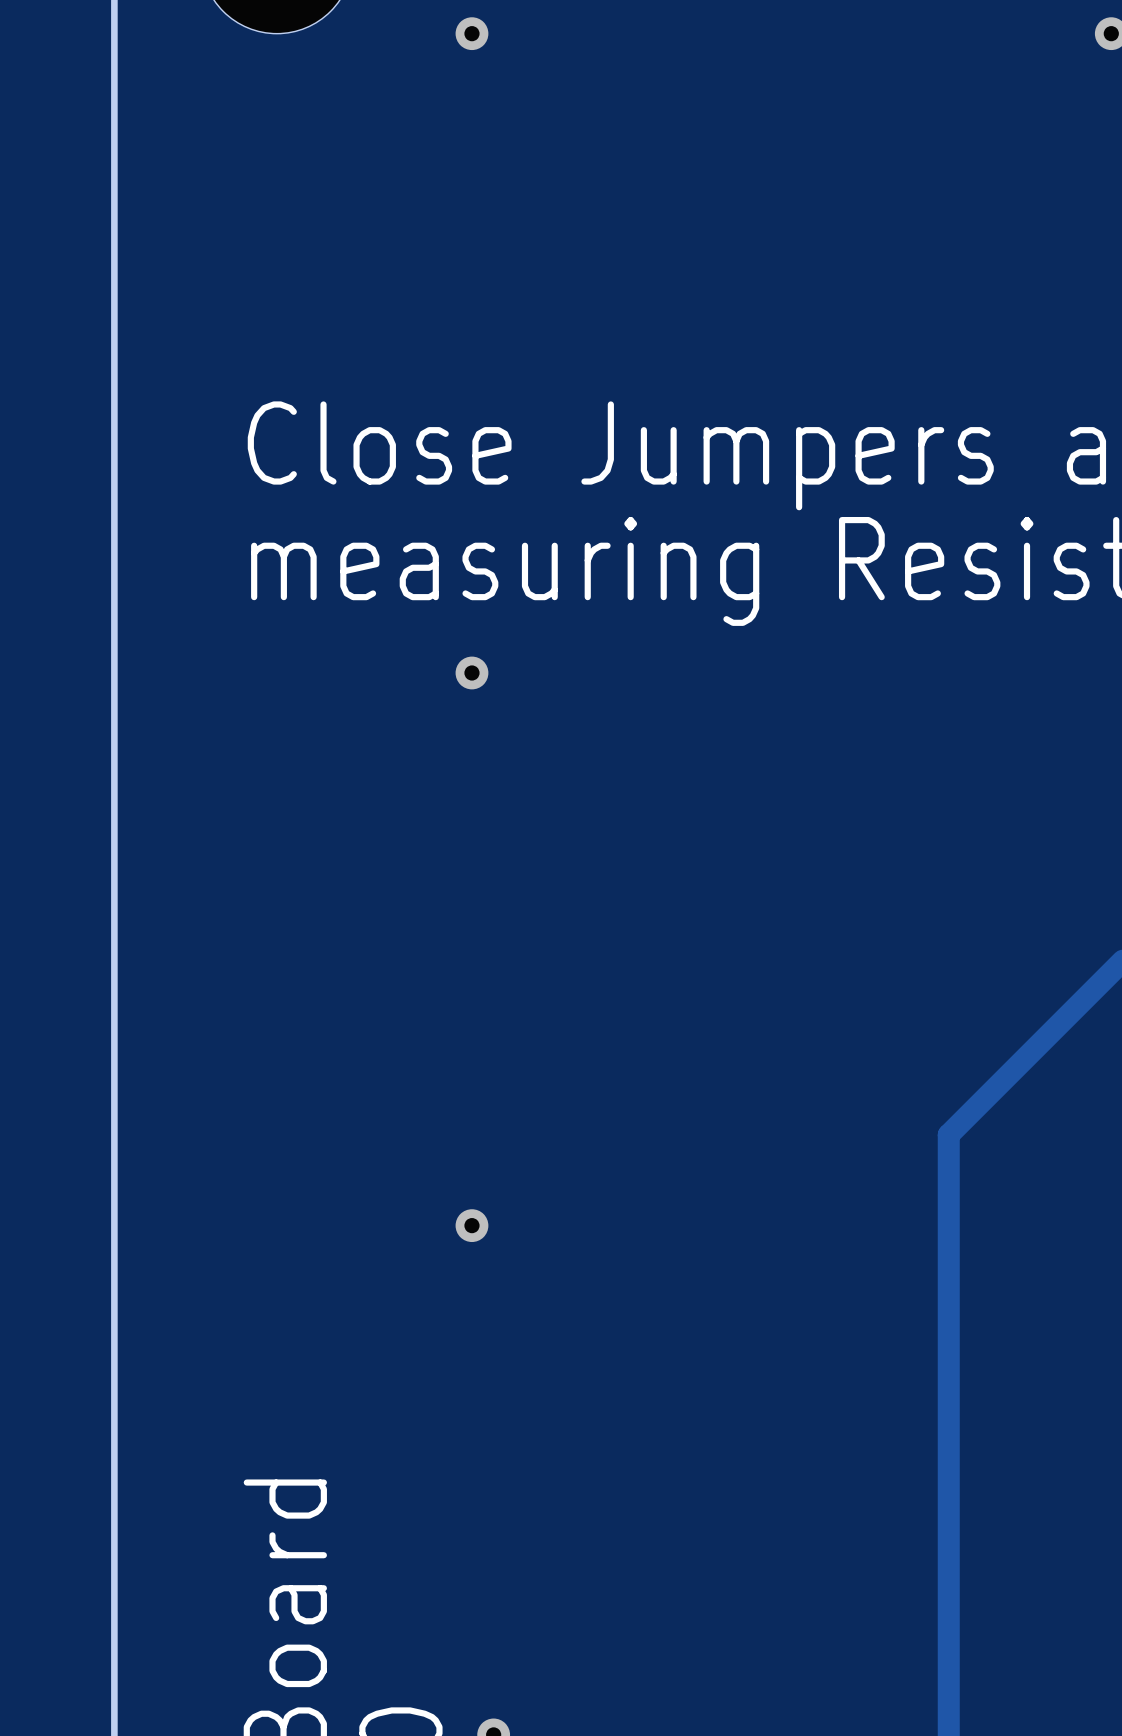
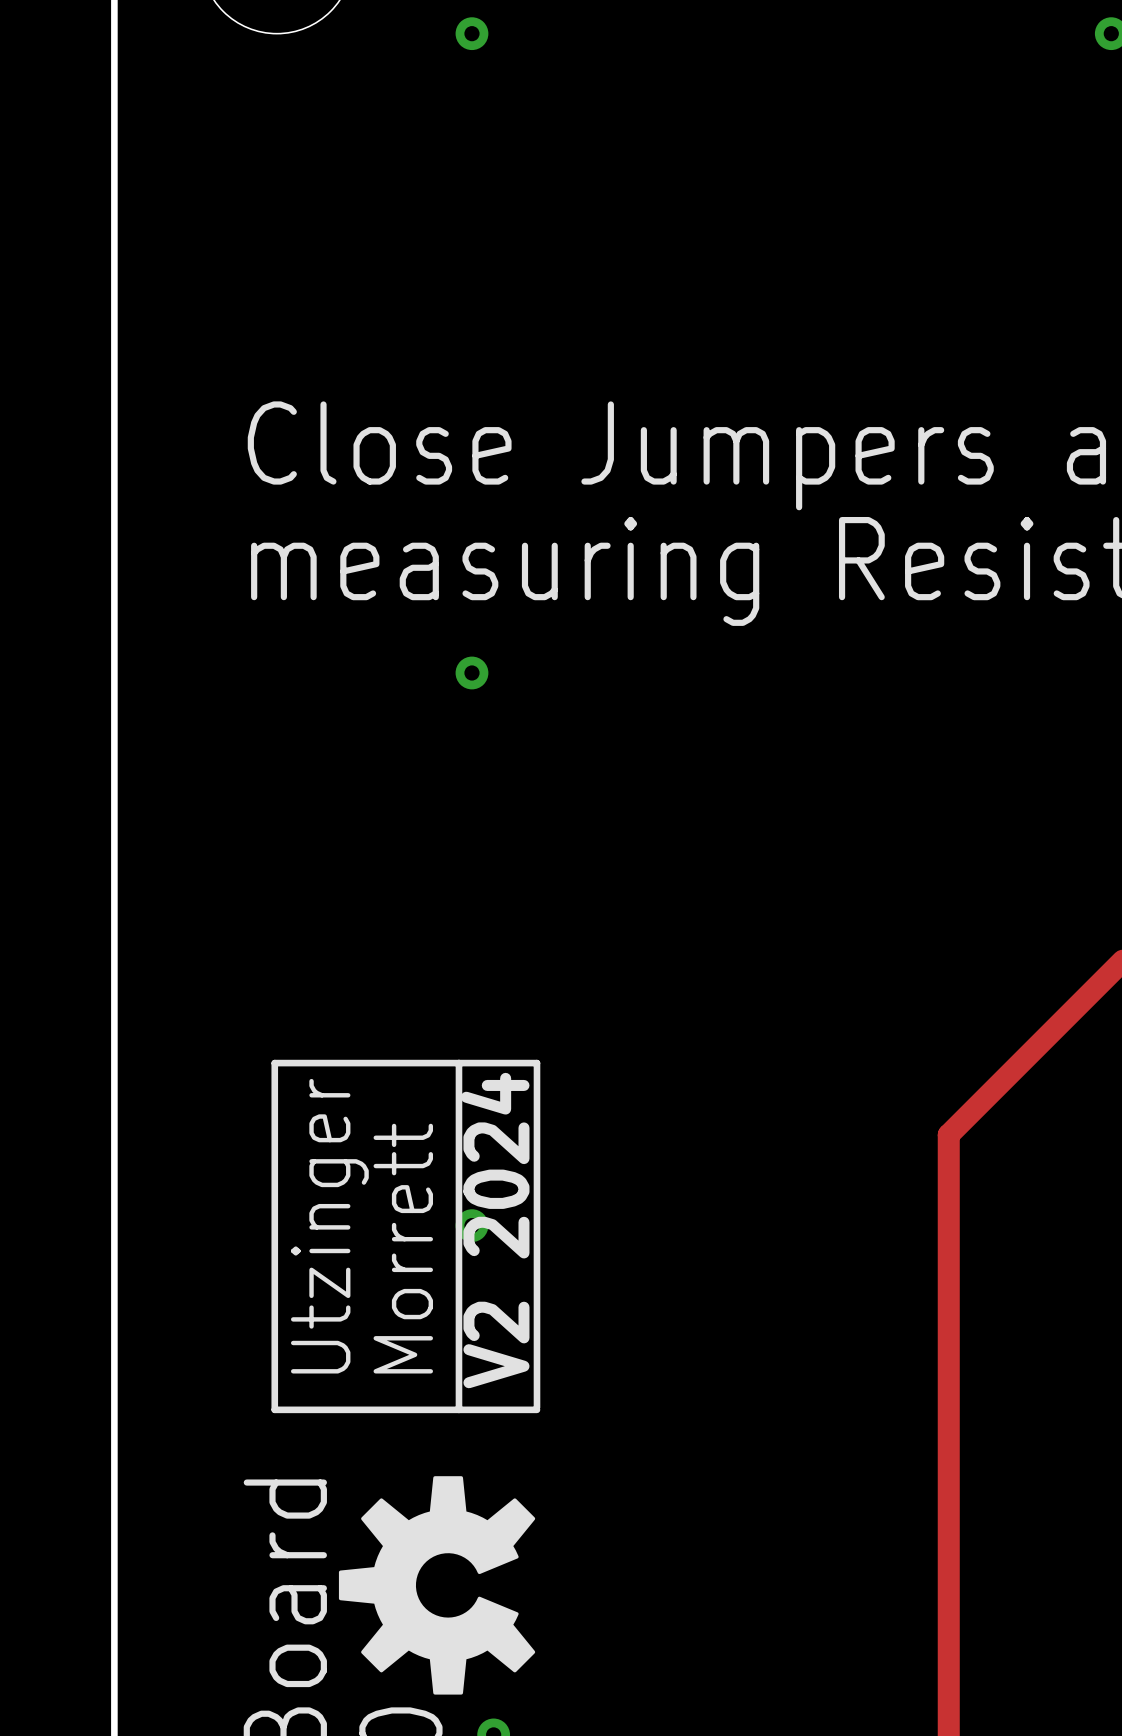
line: none -> (458, 1063) (458, 1409)
text: none -> Utzinger (329, 1226)
text: none -> V2 2024 (495, 1230)
text: none -> Morrett (403, 1248)
line: none -> (536, 1407) (536, 1063) (274, 1063) (274, 1409) (536, 1409)
drawing: none -> [338, 1476, 536, 1695]

